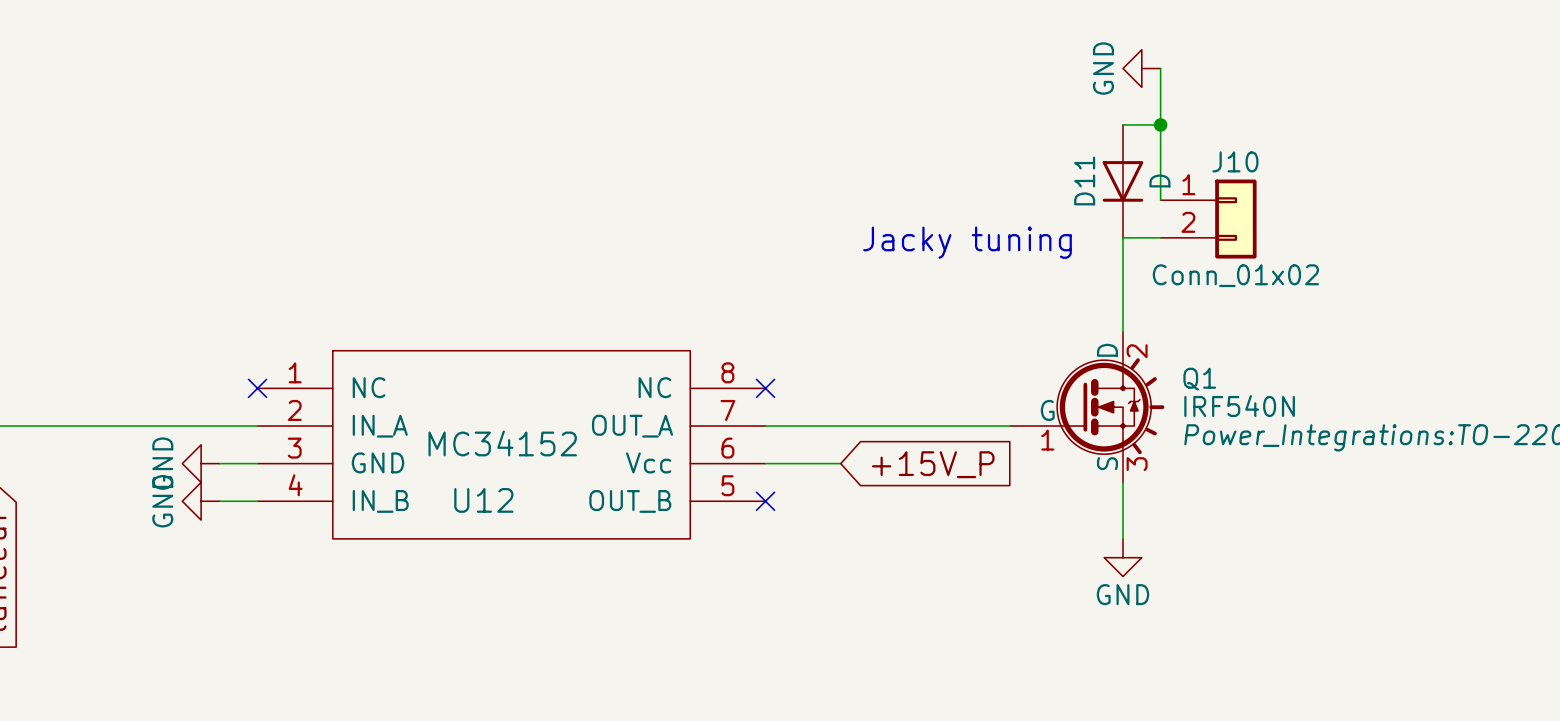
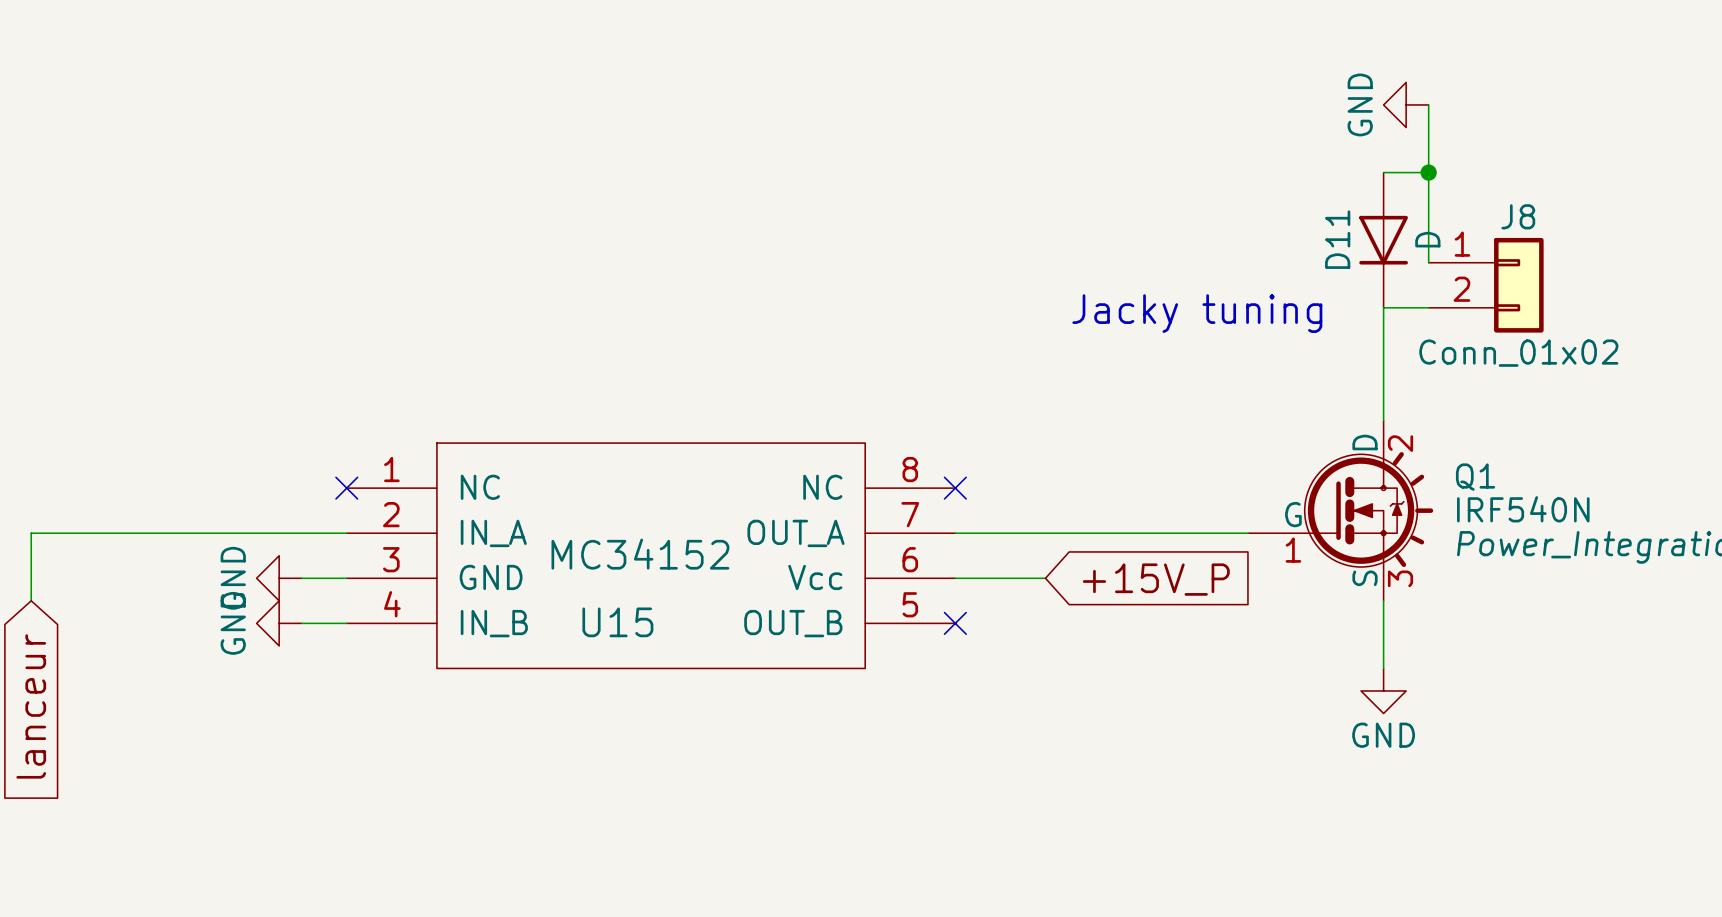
J10 name: J10 (1235, 161) -> J8 (1518, 216)
U12 name: U12 (483, 500) -> U15 (617, 622)

